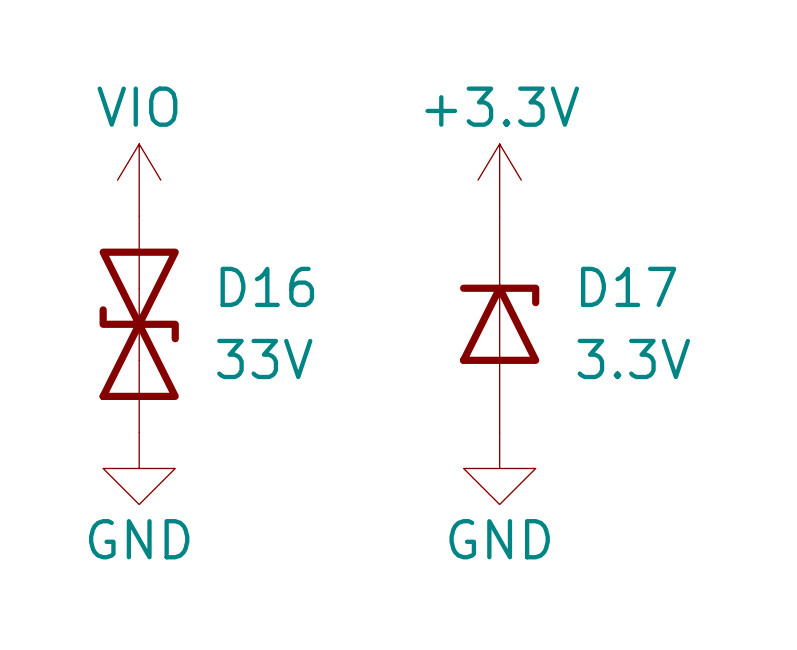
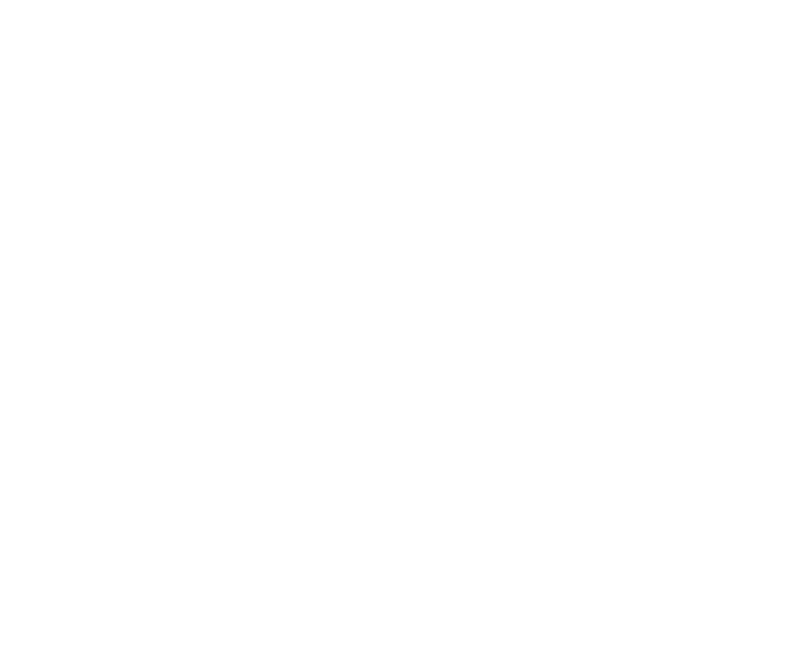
power symbol: VIO (139, 180) -> none
power symbol: +3.3V (499, 180) -> none
D16: 33V (139, 324) -> none
D17: 3.3V (499, 324) -> none
power symbol: GND (139, 468) -> none
power symbol: GND (499, 468) -> none

